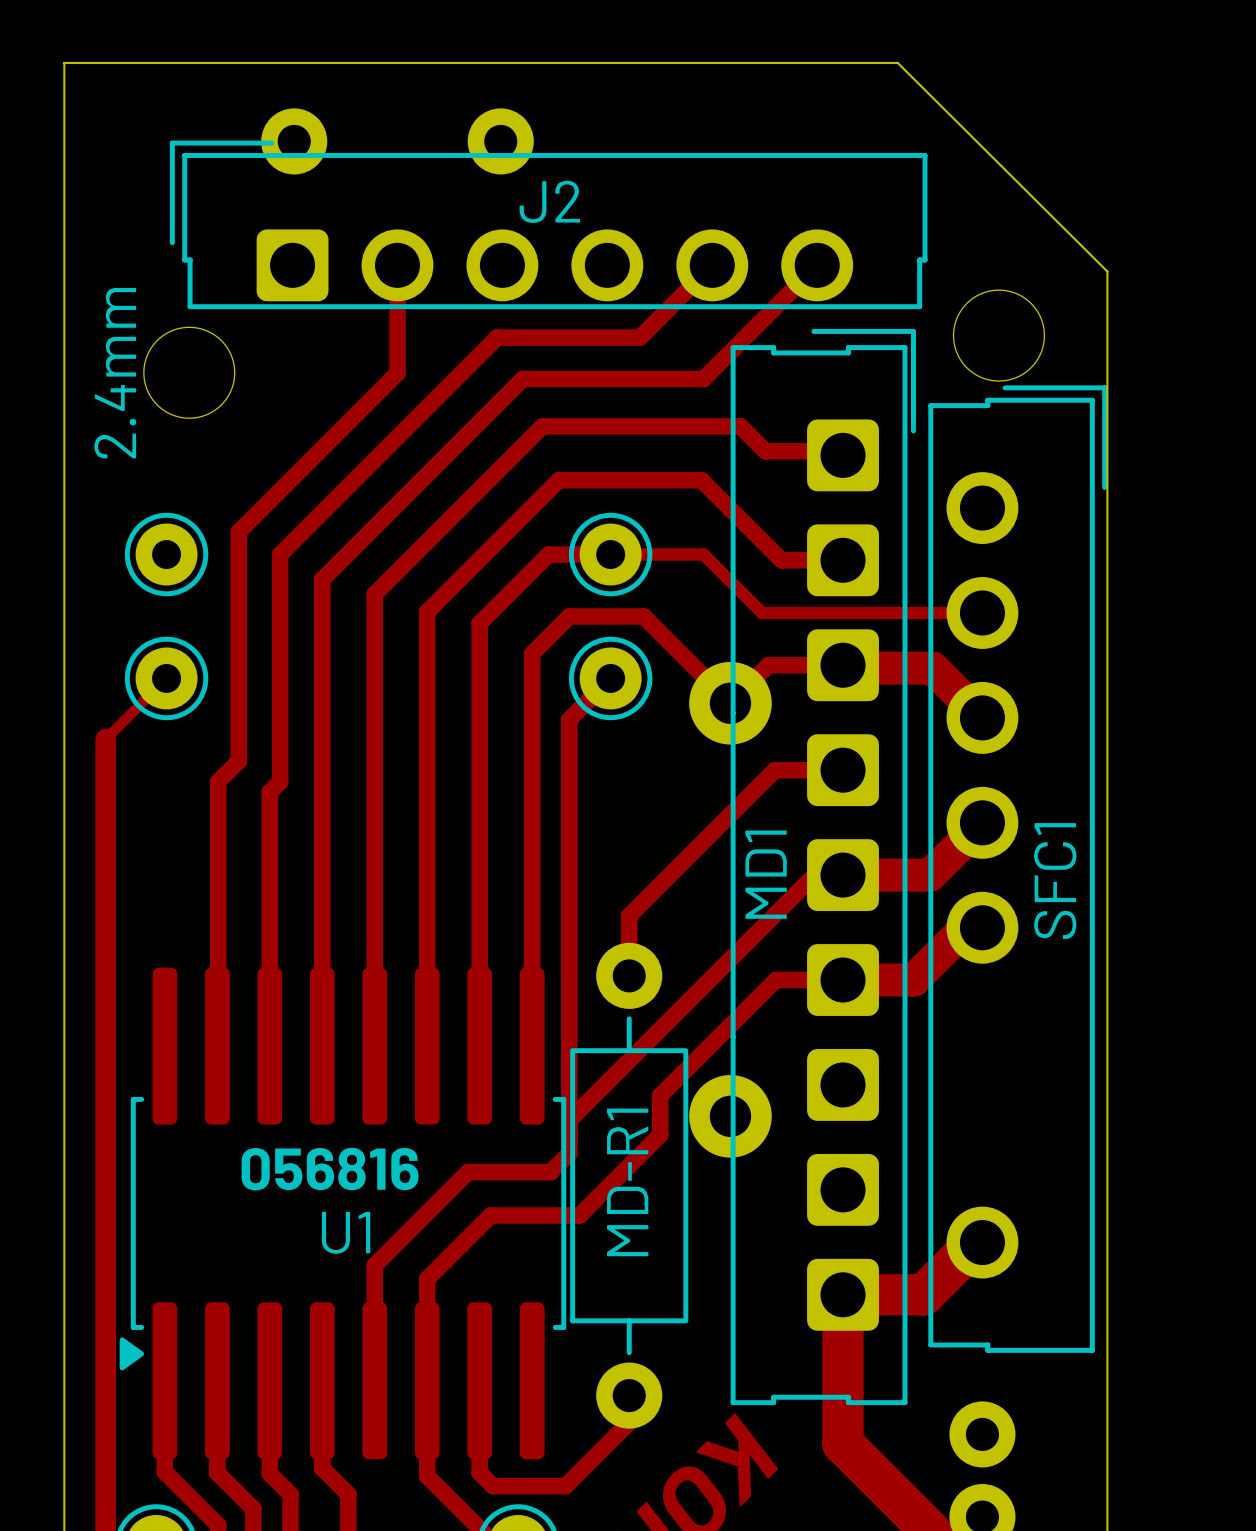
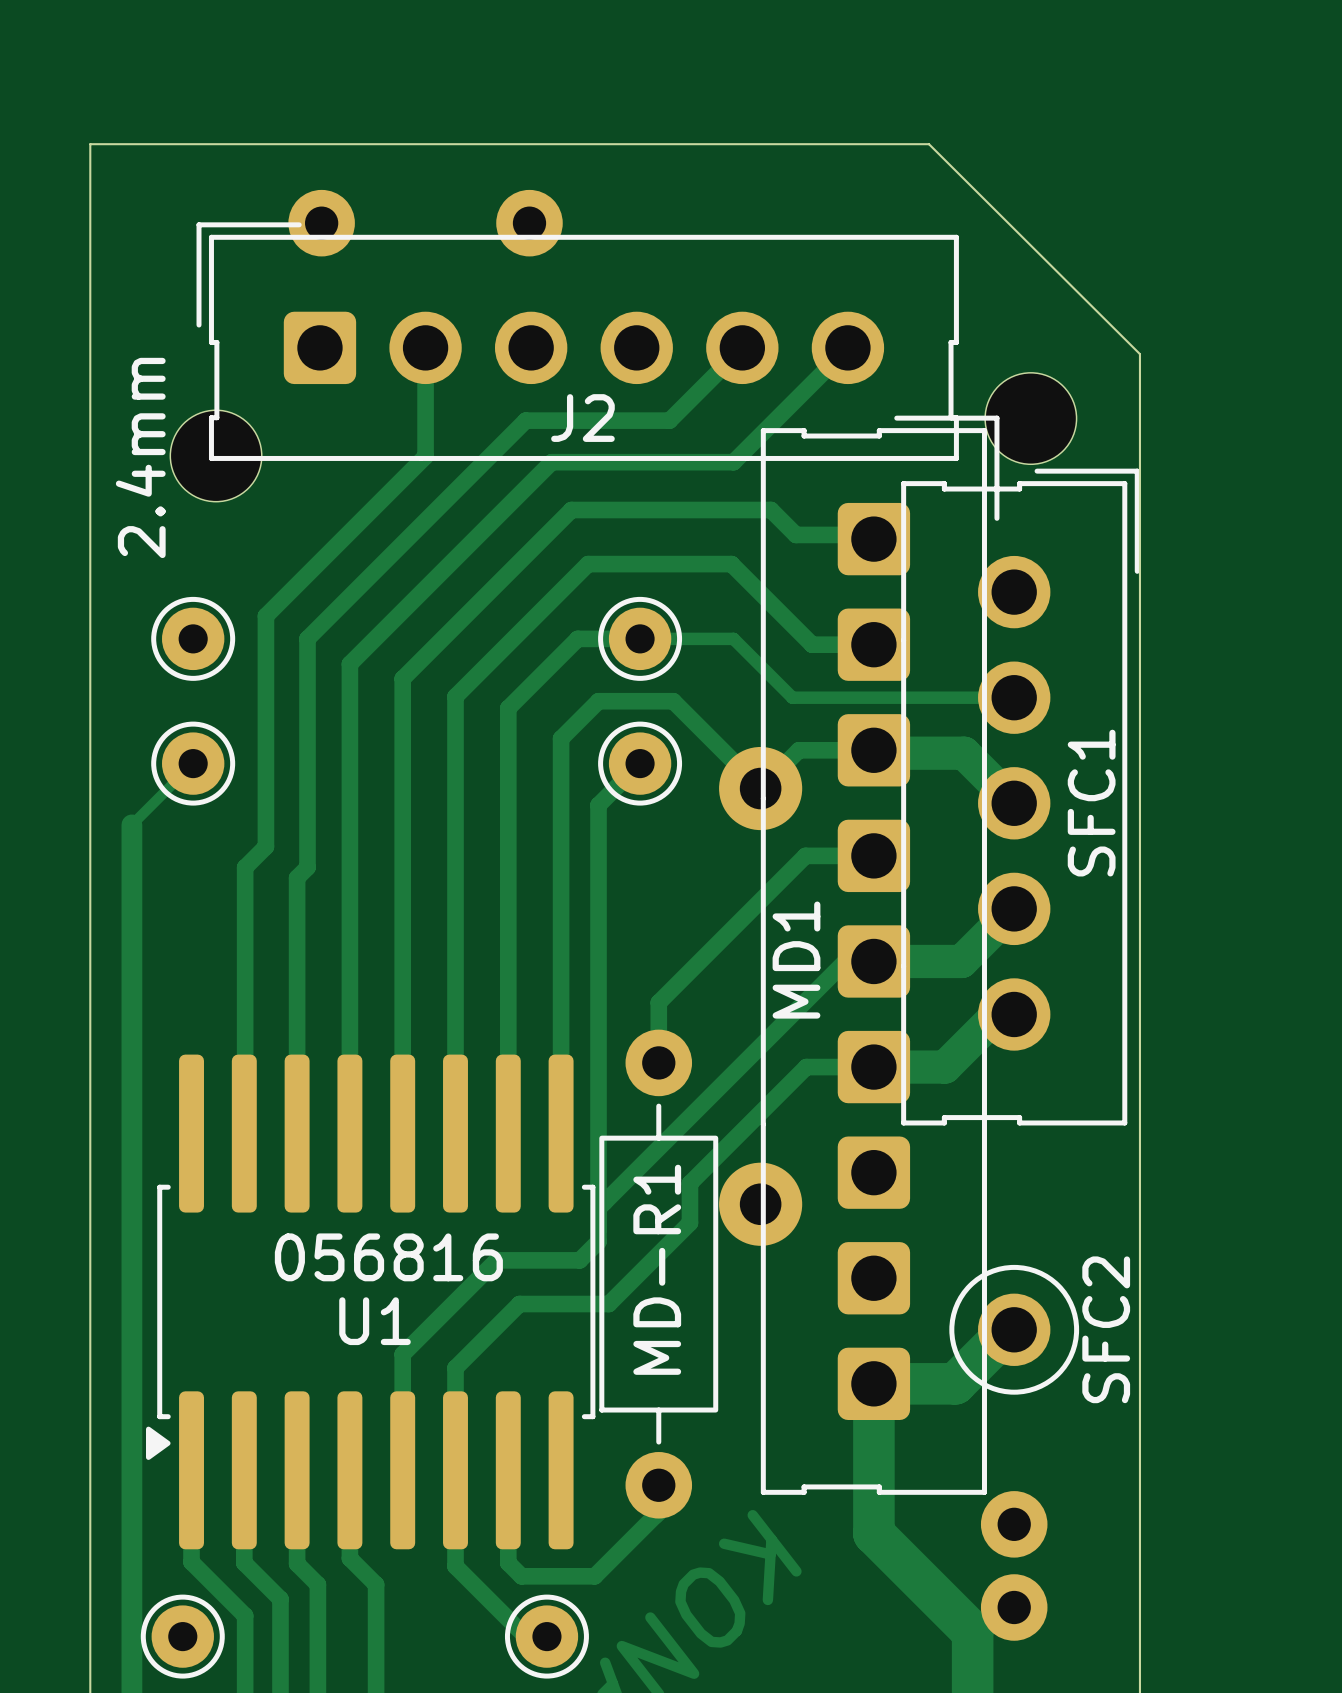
J2 footprint: [169, 140, 928, 310] -> [196, 222, 959, 461]
J2 name position: J2 (549, 201) -> J2 (582, 418)
MD1 footprint: [730, 328, 916, 1406] -> [760, 415, 1000, 1495]
SFC1 footprint: [928, 385, 1108, 1353] -> [901, 468, 1140, 1126]
SFC2: none -> (1014, 1329)

